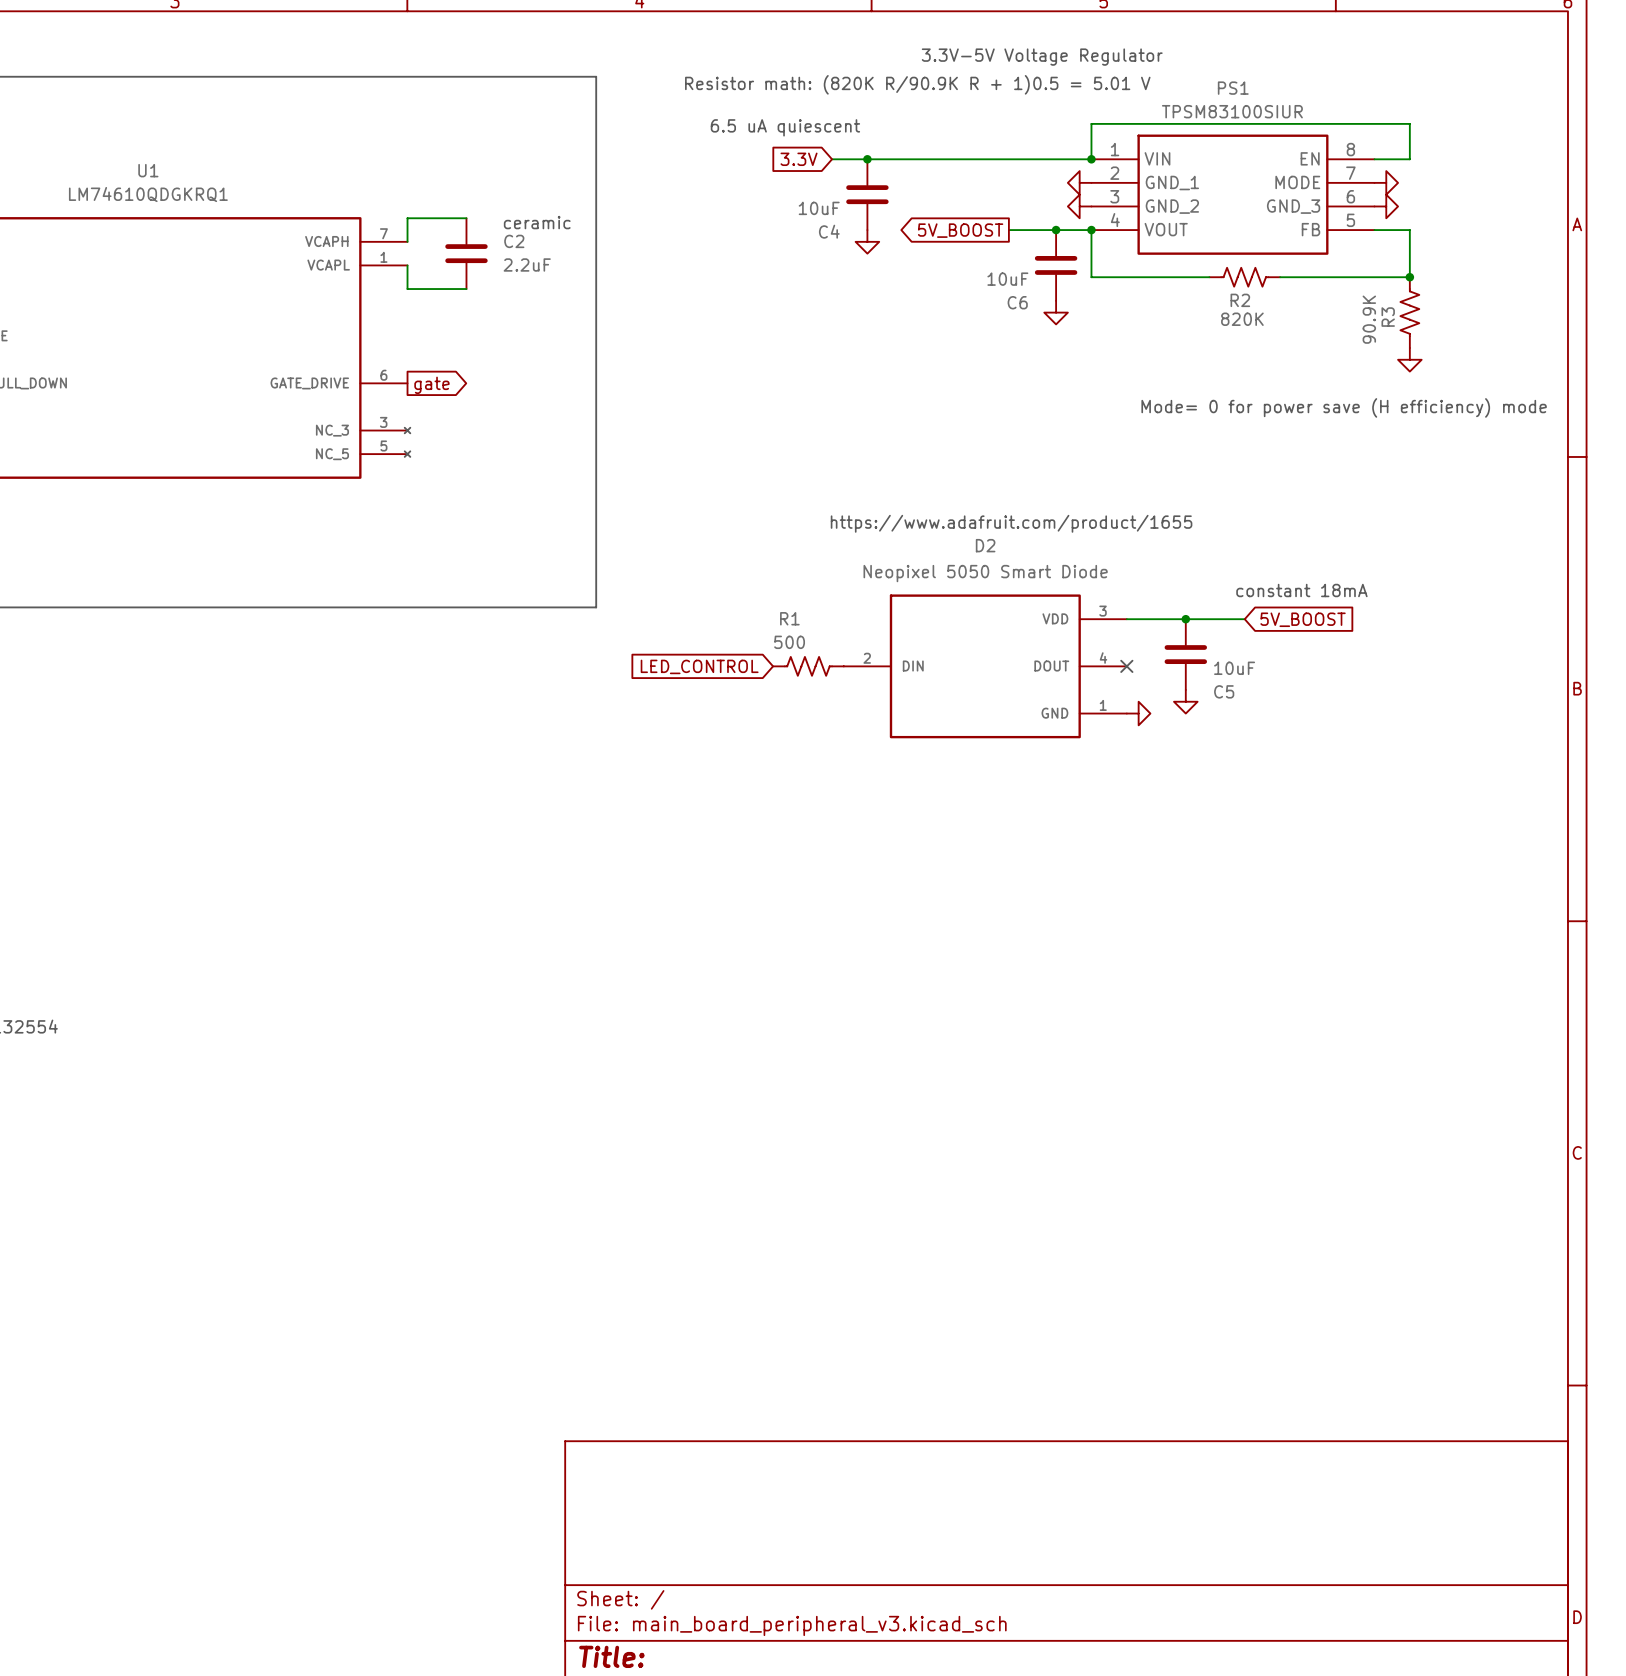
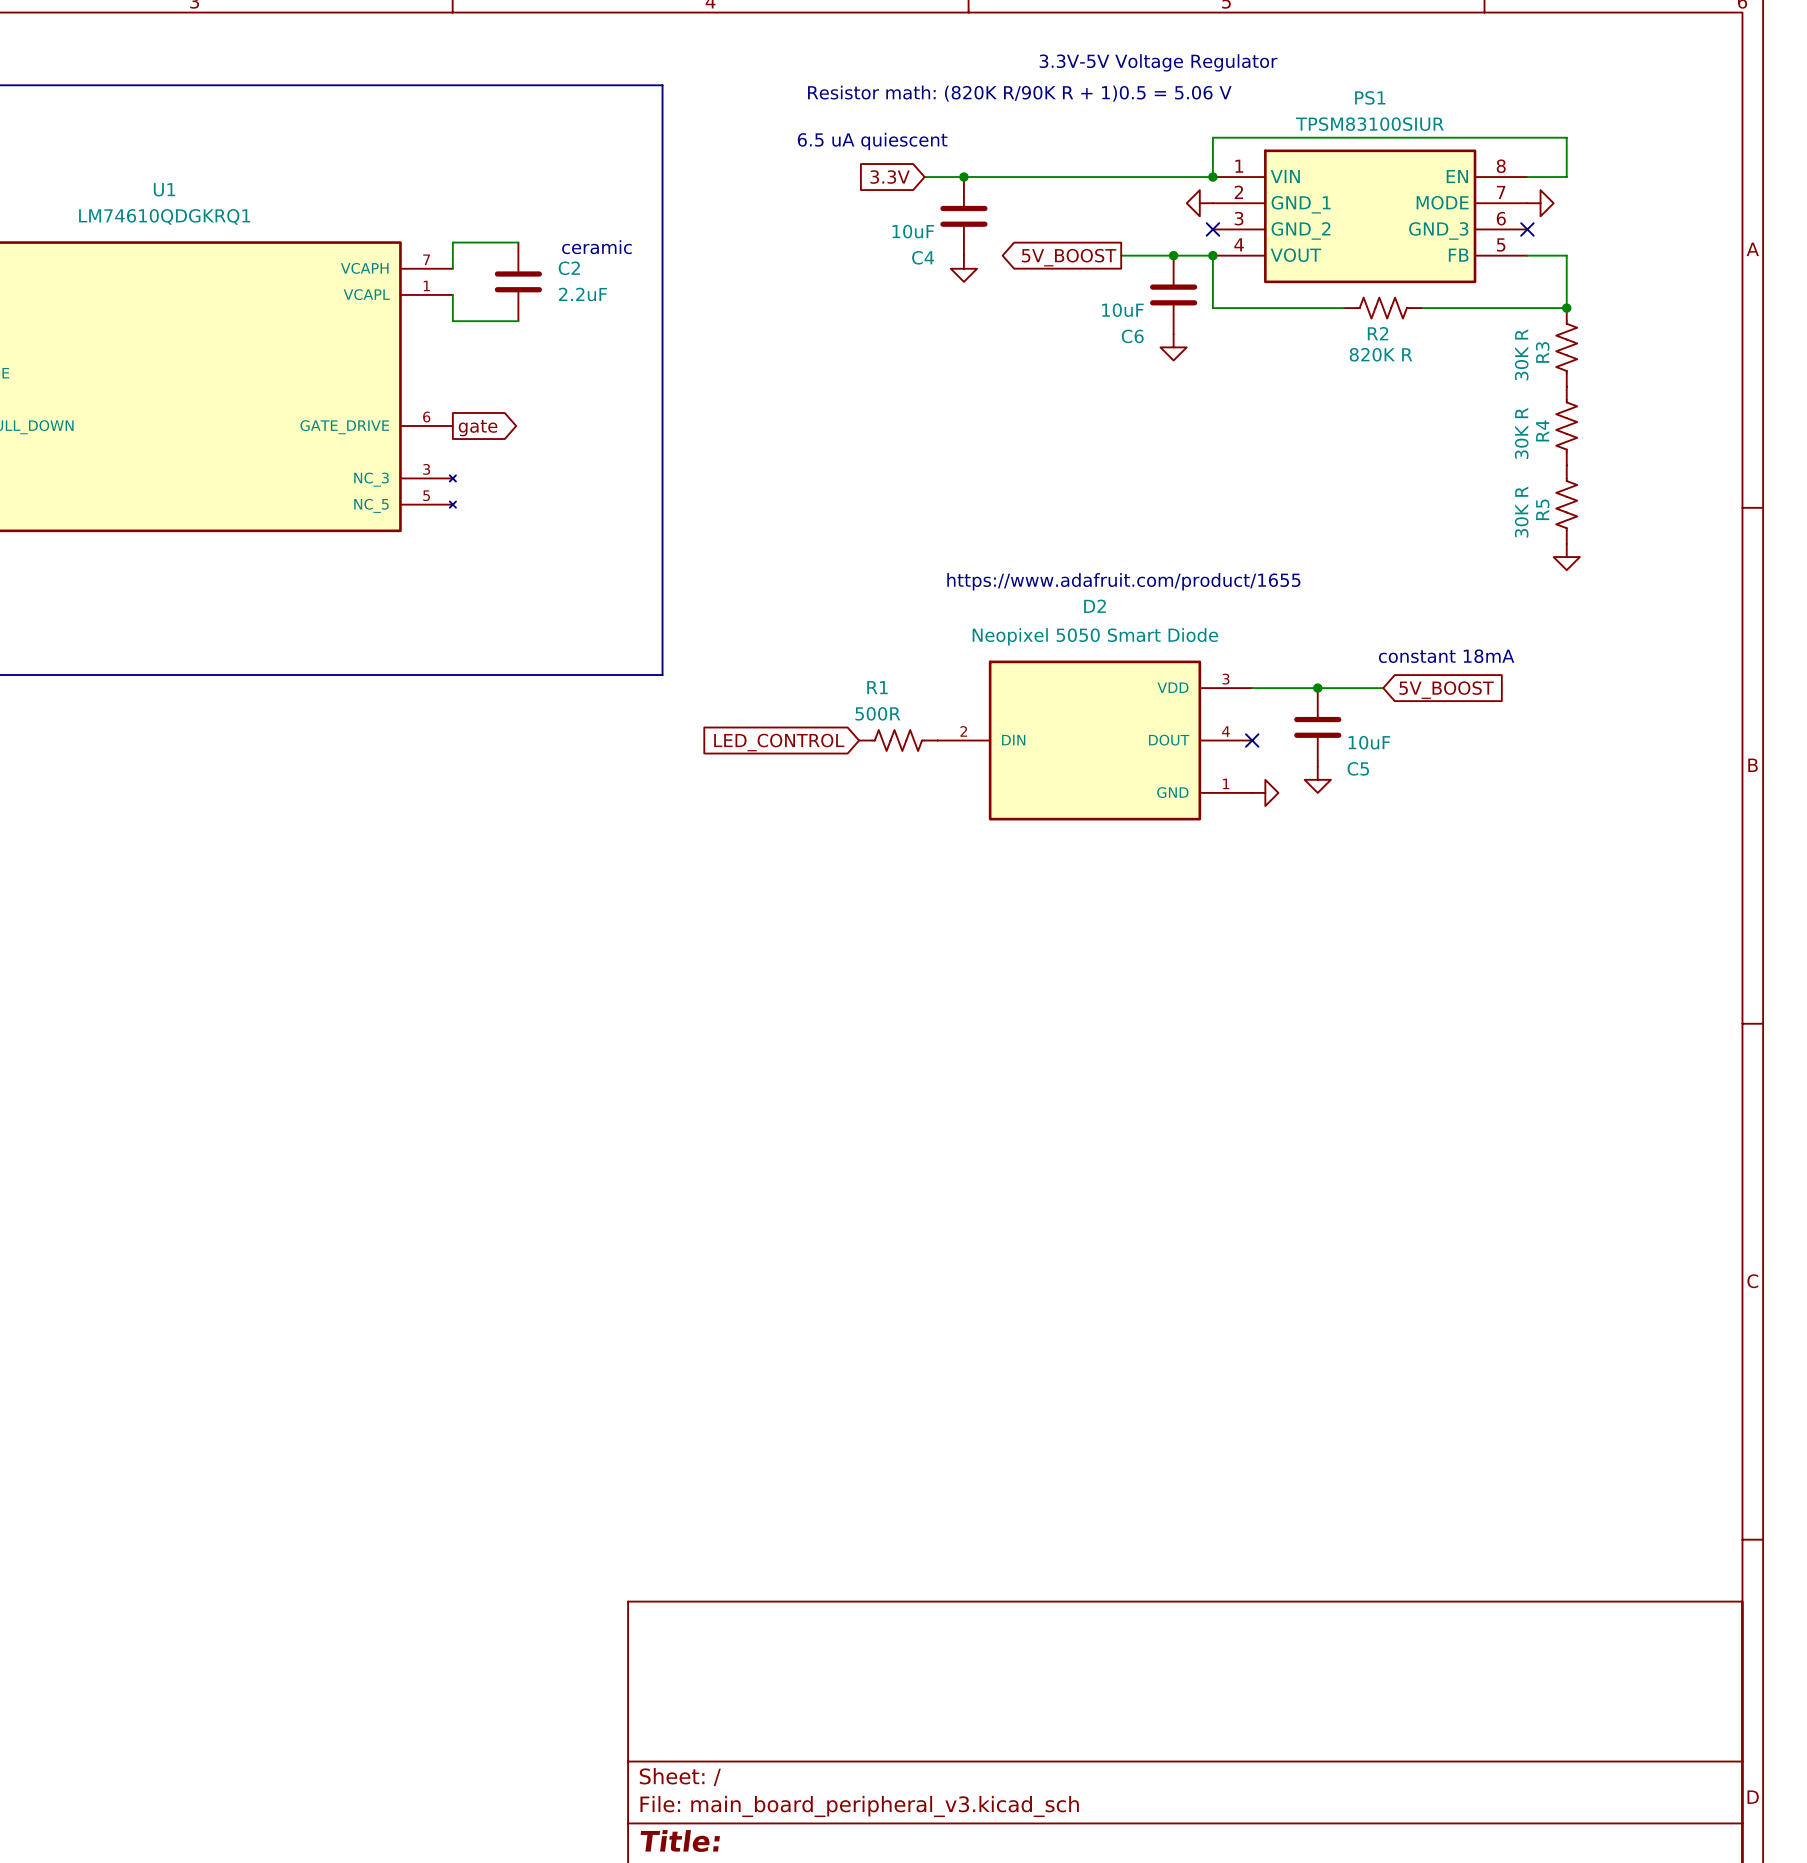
text: Resistor math: (820K R/90.9K R + 1)0.5 = 5.01 V (917, 84) -> Resistor math: (820K R/90K R + 1)0.5 = 5.06 V (1019, 93)
power symbol: (1079, 206) -> none
no-connect mark: none -> (1212, 229)
no-connect mark: none -> (1527, 229)
power symbol: (1386, 206) -> none
R2 value: 820K (1242, 319) -> 820K R (1381, 354)
R3 value: 90.9K (1369, 319) -> 30K R (1521, 354)
power symbol position: (1409, 359) -> (1566, 557)
R4: none -> 30K R (1566, 426)
text: Mode= 0 for power save (H efficiency) mode (1344, 407) -> none
R5: none -> 30K R (1566, 504)
R1 value: 500 (789, 642) -> 500R (877, 713)

